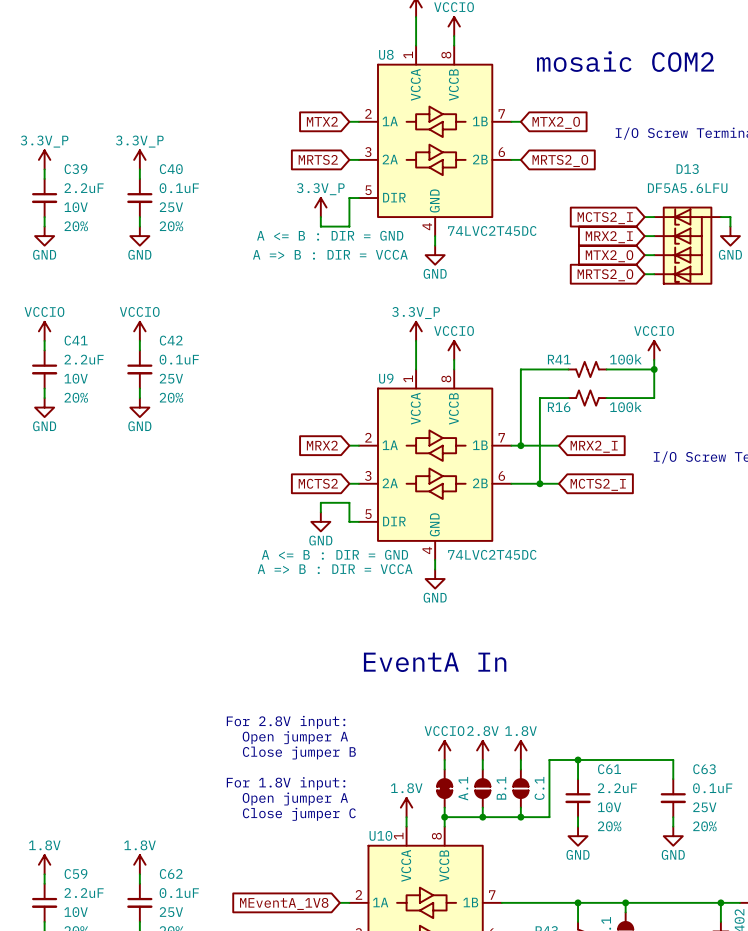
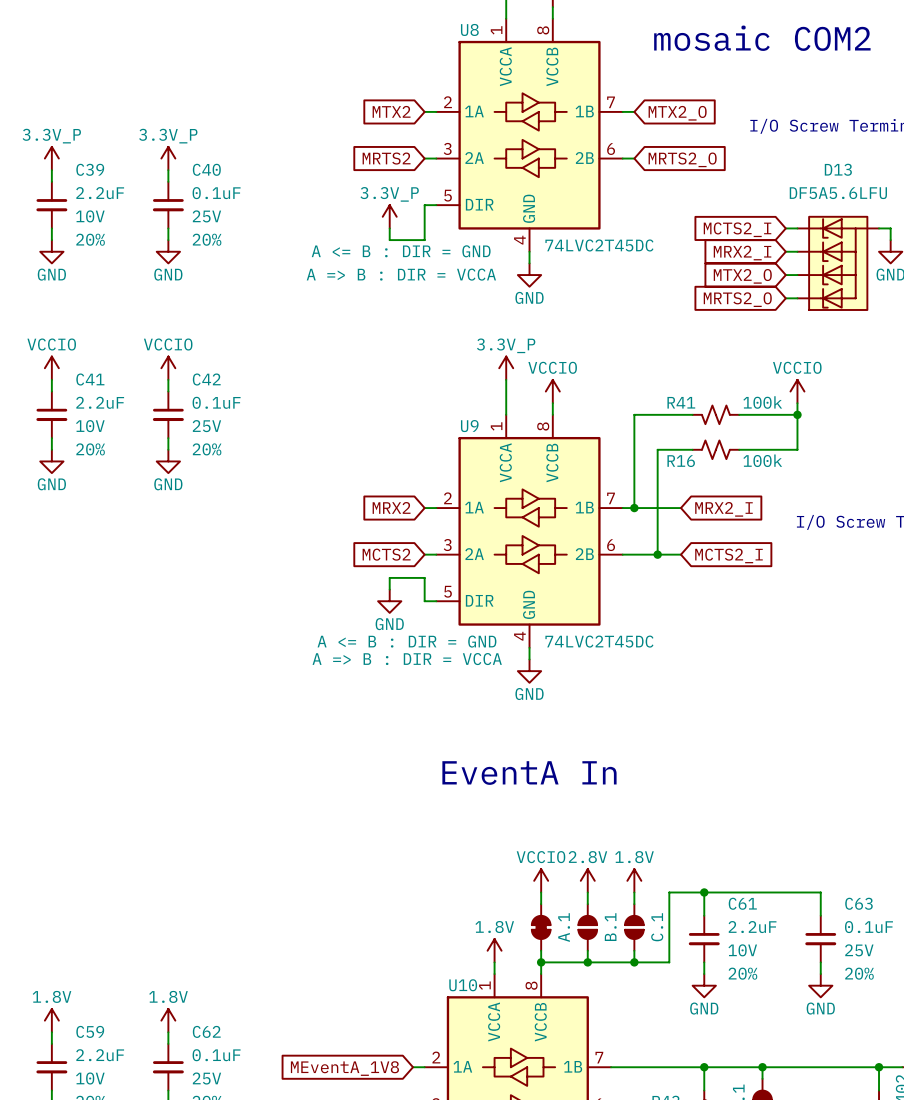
text: For 2.8V input: (286, 722) -> none
text: Open jumper A (295, 737) -> none
text: Close jumper B (299, 752) -> none
text: For 1.8V input: (286, 783) -> none
text: Open jumper A (295, 798) -> none
text: Close jumper C (299, 814) -> none

